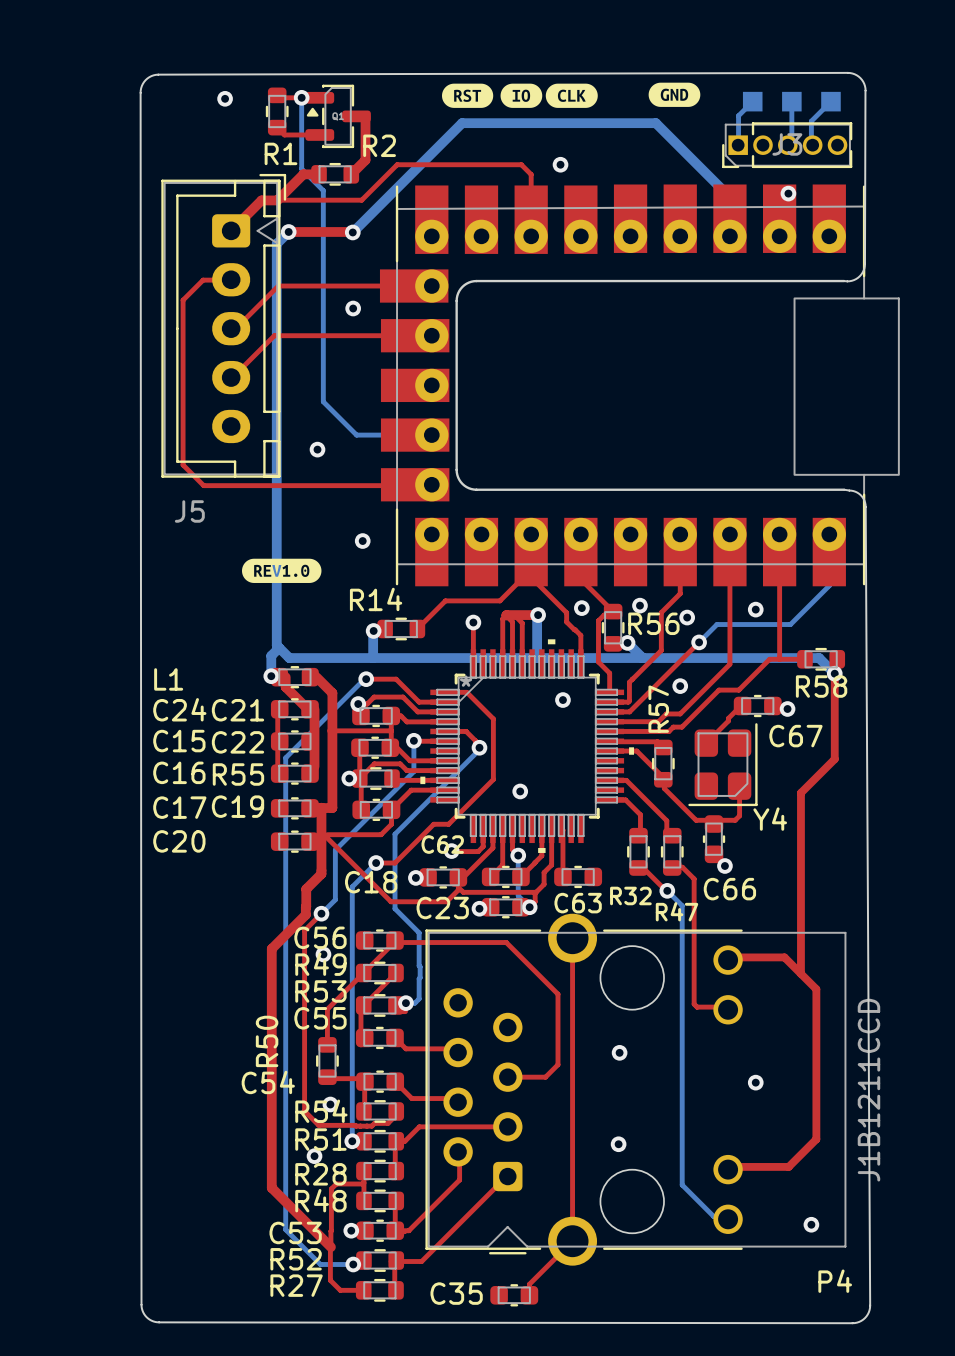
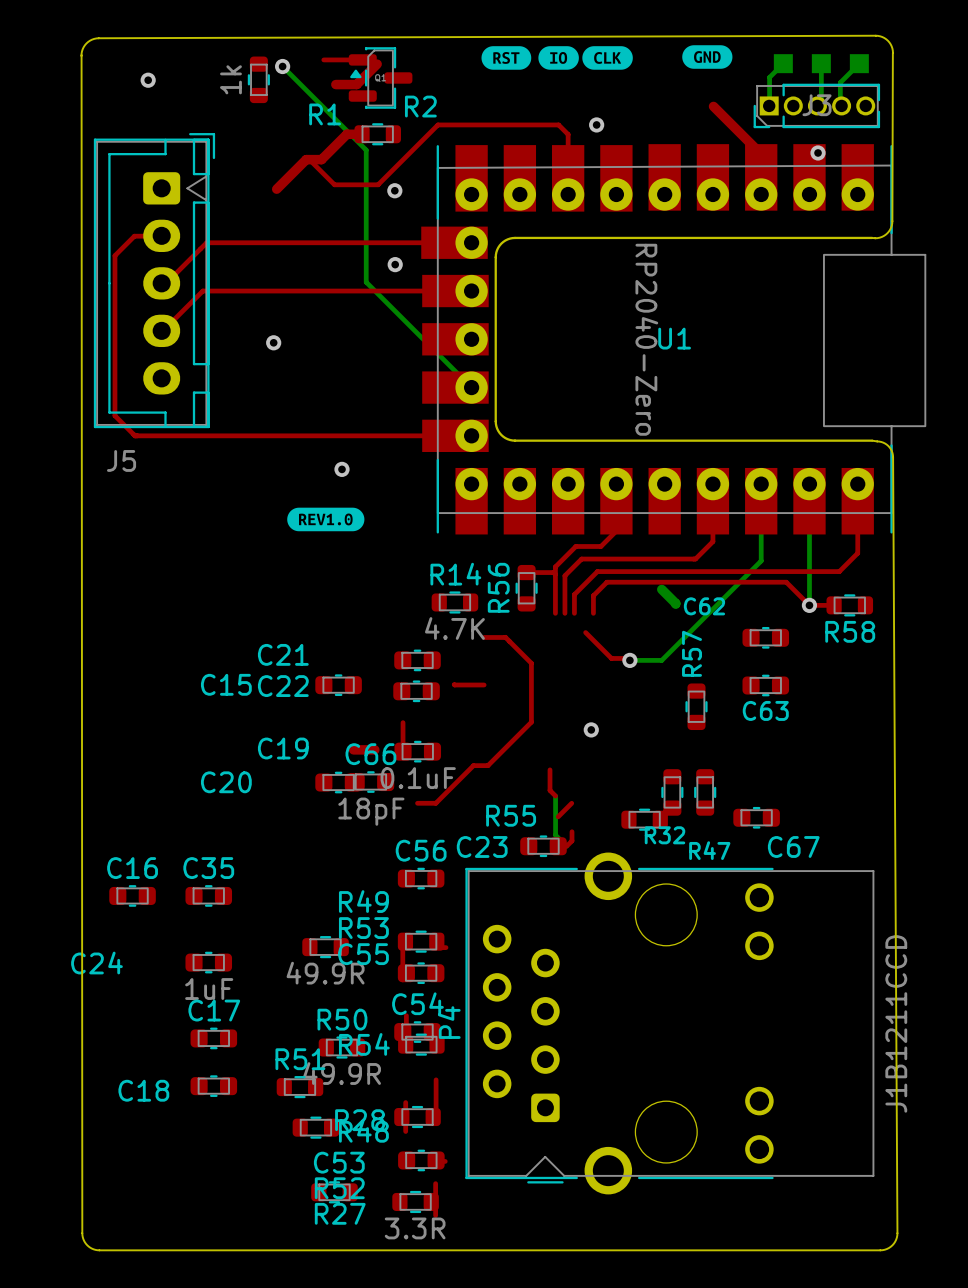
board edge: (847, 72) (158, 74) (149, 77) (142, 83) (140, 92) (141, 1304) (146, 1317) (159, 1322) (852, 1323) -> (81, 55) (82, 1233) (84, 1242) (91, 1248) (99, 1250) (880, 1250)
board edge: none -> (875, 35) (98, 38) (86, 43) (81, 55)
bottom track: (301, 97) (301, 168) -> (282, 66) (345, 129)
via: (301, 97) -> none
via position: (225, 98) -> (282, 66)
top track: none -> (377, 64) (356, 84) (335, 84)
R1 position: (277, 111) -> (258, 79)
top track: (365, 116) (365, 160) (351, 174) -> none
via: none -> (148, 80)
R1 value: none -> 1k (230, 79)
top track: (277, 127) (284, 134) (319, 134) -> none
top track: none -> (713, 106) (761, 154)
top track: (277, 200) (361, 200) -> (309, 159) (334, 184) (378, 184) (403, 159)
top track: (288, 231) (352, 232) -> none
bottom track: (288, 231) (276, 243) (276, 645) (289, 658) (819, 658) (834, 673) -> none
via: (288, 231) -> none
bottom track: (352, 232) (462, 123) (655, 123) (729, 197) (729, 236) -> none
top track: none -> (160, 236) (134, 236) (114, 255) (114, 415) (135, 435) (455, 435)
top track: (230, 280) (203, 280) (183, 300) (183, 464) (203, 485) (414, 485) -> none
top track: (278, 286) (232, 331) -> (322, 242) (206, 242) (163, 286)
J5 position: (223, 325) -> (154, 280)
bottom track: (323, 326) (323, 401) (356, 435) (431, 435) -> (366, 282) (471, 387)
top track: (274, 335) (231, 378) -> (318, 291) (202, 291) (161, 332)
U1 name: none -> U1 (674, 338)
U1 value: none -> RP2040-Zero (646, 339)
via: none -> (273, 342)
via: (317, 449) -> none
via: none -> (342, 469)
bottom track: none -> (761, 484) (761, 560) (661, 660) (629, 660) (627, 658)
bottom track: none -> (809, 484) (809, 605)
bottom track: (829, 534) (829, 585) (790, 624) (716, 624) (699, 642) -> none
via: (362, 541) -> none
top track: none -> (616, 501) (616, 531) (600, 546) (575, 546) (555, 566) (555, 613)
top track: (729, 552) (729, 664) (680, 713) (666, 713) (658, 721) (609, 721) -> none
top track: (779, 552) (779, 659) -> (593, 613) (593, 595) (606, 582) (786, 582) (809, 605)
top track: none -> (857, 501) (857, 553) (839, 571) (597, 571) (574, 594) (574, 613)
top track: (531, 569) (499, 600) (445, 600) (417, 628) -> none
top track: (530, 576) (566, 612) (566, 622) (580, 635) (580, 663) -> none
top track: (580, 579) (613, 611) -> none
R14 name position: R14 (376, 599) -> R14 (455, 574)
via: (639, 605) -> none
via: (581, 608) -> none
via: (755, 609) -> none
top track: (662, 611) (661, 650) (629, 682) (629, 700) (609, 702) -> (695, 559) (581, 559) (564, 575) (564, 613)
top track: (506, 615) (502, 618) (502, 663) -> none
top track: (506, 615) (512, 622) (512, 663) -> none
top track: (506, 615) (514, 615) (522, 623) (522, 663) -> none
top track: (538, 615) (506, 615) -> none
bottom track: (538, 615) (537, 658) -> none
via: (538, 615) -> none
top track: (609, 615) (604, 615) (598, 620) (598, 662) (609, 673) (609, 692) -> none
top track: (473, 617) (473, 663) -> none
via: (687, 617) -> none
via: (473, 622) -> none
R56 name rotation: 0° (653, 623) -> 90° counterclockwise (498, 587)
top track: none -> (526, 572) (553, 572) (555, 574)
R56 position: (613, 627) -> (526, 588)
R14 position: (401, 628) -> (454, 602)
bottom track: (373, 630) (373, 658) -> none
via: (373, 630) -> none
via: (627, 642) -> none
top track: (699, 642) (629, 711) (609, 711) -> none
via: (699, 642) -> none
bottom track: (279, 647) (271, 655) (271, 676) -> none
top track: (778, 659) (769, 659) (738, 690) (718, 690) (681, 727) (673, 727) (668, 731) (609, 731) -> none
via: none -> (809, 605)
top track: (834, 673) (834, 759) (800, 792) (800, 973) -> none
via: (834, 673) -> none
via: (271, 676) -> none
top track: (285, 677) (285, 687) (308, 709) -> none
L1: (294, 677) -> none
top track: (316, 677) (332, 693) (332, 807) -> none
top track: (366, 679) (396, 679) (419, 702) (444, 702) -> none
bottom track: (366, 679) (285, 757) (285, 1229) (320, 1264) (353, 1264) -> none
via: (366, 679) -> none
R14 value: none -> 4.7K (454, 628)
via: (680, 686) -> none
top track: none -> (585, 632) (611, 658) (627, 658) (629, 660)
via position: (562, 700) -> (629, 660)
top track: (358, 704) (367, 704) (374, 697) (402, 697) (417, 711) (444, 711) -> none
via: (358, 704) -> none
top track: (277, 706) (277, 765) -> none
top track: (740, 706) (706, 743) -> none
C67 position: (757, 706) -> (756, 817)
via: (787, 708) -> none
C24 position: (294, 709) -> (208, 962)
top track: (314, 709) (314, 766) -> none
top track: (444, 721) (406, 721) (400, 715) (391, 715) (391, 746) -> none
top track: (333, 730) (391, 730) -> none
top track: (444, 731) (466, 731) (475, 740) (475, 749) -> none
bottom track: (413, 740) (413, 771) (335, 850) (335, 899) (321, 913) -> none
via: (413, 740) -> none
top track: (609, 741) (657, 741) (663, 747) -> none
part: (527, 746) -> none
top track: (359, 747) (359, 778) (374, 763) (400, 763) (406, 770) (444, 770) -> none
bottom track: (479, 747) (395, 834) (395, 908) (419, 932) (419, 998) (414, 1003) (405, 1003) -> none
via: (479, 747) -> none
top track: (609, 751) (636, 751) (663, 777) -> none
top track: (392, 752) (397, 747) (410, 760) (444, 760) -> none
Y4: (722, 764) -> none
C16 name position: C16 (179, 772) -> C16 (132, 868)
C16 position: (294, 773) -> (132, 895)
via: (349, 778) -> none
R55 position: (375, 778) -> (644, 819)
top track: (664, 778) (664, 788) (696, 820) (710, 820) -> none
top track: (393, 780) (444, 780) -> none
top track: (609, 780) (626, 780) (666, 820) (666, 832) -> none
top track: (739, 786) (739, 815) (735, 820) (717, 820) -> none
top track: (444, 790) (411, 790) (391, 809) (391, 824) (381, 834) (327, 834) -> none
via position: (520, 791) -> (591, 729)
top track: (609, 799) (625, 799) (640, 814) (640, 832) -> none
C17 name position: C17 (179, 807) -> C17 (214, 1010)
top track: (321, 807) (321, 873) (306, 889) (305, 914) (271, 948) (271, 1187) (330, 1247) -> none
C17 position: (294, 808) -> (213, 1038)
top track: (483, 828) (483, 846) (478, 851) (451, 851) -> none
top track: (492, 828) (492, 847) (463, 877) -> none
top track: (502, 828) (502, 864) (490, 876) -> none
top track: (541, 828) (541, 855) (534, 862) -> none
top track: (551, 828) (551, 865) (544, 872) (544, 884) (536, 892) (463, 892) (458, 887) -> none
top track: (561, 828) (562, 876) -> none
C19 value: none -> 0.1uF (418, 778)
top track: (327, 838) (391, 901) (446, 901) (458, 890) (458, 877) -> none
C66 rotation: 0° (714, 839) -> 90° clockwise (370, 782)
C66 position: (714, 839) -> (370, 782)
via: (451, 851) -> none
via: (518, 855) -> none
bottom track: (376, 863) (352, 886) (352, 1141) -> none
via: (376, 863) -> none
top track: (640, 865) (667, 890) -> none
via: (724, 866) -> none
top track: (671, 867) (682, 867) (694, 878) (694, 1004) (697, 1007) (725, 1007) -> none
C66 value: none -> 18pF (371, 811)
C62 position: (505, 876) -> (765, 637)
C63 position: (578, 876) -> (765, 685)
via: (415, 877) -> none
C18 position: (443, 877) -> (213, 1086)
C66 name position: C66 (729, 889) -> C66 (370, 754)
bottom track: (667, 890) (682, 905) (682, 1184) (713, 1216) (725, 1216) -> none
via: (667, 890) -> none
via: (529, 907) -> none
via: (479, 908) -> none
top track: (321, 913) (304, 930) (304, 1111) (318, 1125) (371, 1126) (374, 1123) (388, 1123) (396, 1115) -> none
via: (321, 913) -> none
C56 name position: C56 (320, 937) -> C56 (421, 850)
top track: (572, 938) (572, 1241) (529, 1284) (529, 1295) -> none
top track: (395, 941) (327, 1009) (327, 1044) -> none
top track: (391, 942) (506, 942) (557, 994) (557, 1064) (545, 1077) (507, 1077) -> none
via: (323, 954) -> none
top track: (730, 957) (784, 957) (816, 989) (816, 1139) (788, 1166) (730, 1166) -> none
R49 position: (379, 972) -> (325, 947)
top track: (395, 973) (363, 1005) -> none
via: (405, 1003) -> none
R49 value: none -> 49.9R (325, 973)
top track: (395, 1037) (405, 1048) (454, 1048) -> none
via: (619, 1052) -> none
C24 value: none -> 1uF (209, 989)
R50 rotation: 0° (327, 1061) -> 90° clockwise (341, 1047)
R50 position: (327, 1061) -> (341, 1047)
top track: (331, 1078) (361, 1078) -> none
C54 position: (380, 1081) -> (417, 1032)
top track: (395, 1081) (411, 1098) (454, 1098) -> none
C54 name position: C54 (268, 1082) -> C54 (417, 1003)
via: (755, 1082) -> none
via: (330, 1104) -> none
top track: (507, 1126) (419, 1126) (404, 1141) (396, 1141) -> none
R51 name position: R51 (320, 1139) -> R51 (300, 1059)
R50 value: none -> 49.9R (341, 1073)
via: (352, 1141) -> none
R51 position: (380, 1141) -> (299, 1087)
via: (618, 1144) -> none
top track: (459, 1153) (459, 1180) (408, 1230) (395, 1230) (395, 1201) -> none
via: (314, 1156) -> none
R28 position: (380, 1171) -> (417, 1117)
top track: (506, 1176) (421, 1261) (391, 1261) -> none
top track: (363, 1183) (336, 1183) (331, 1188) (330, 1247) -> none
R48 position: (380, 1200) -> (315, 1127)
via: (811, 1224) -> none
via: (351, 1230) -> none
top track: (330, 1247) (330, 1280) (340, 1290) (363, 1290) -> none
R52 position: (380, 1260) -> (415, 1201)
via: (353, 1264) -> none
P4 name rotation: 0° (835, 1281) -> 90° counterclockwise (449, 1022)
P4 name position: P4 (835, 1281) -> P4 (449, 1022)
R27 position: (379, 1290) -> (334, 1192)
C35 name position: C35 (456, 1293) -> C35 (208, 868)
C35 position: (514, 1295) -> (208, 895)
R52 value: none -> 3.3R (415, 1228)

